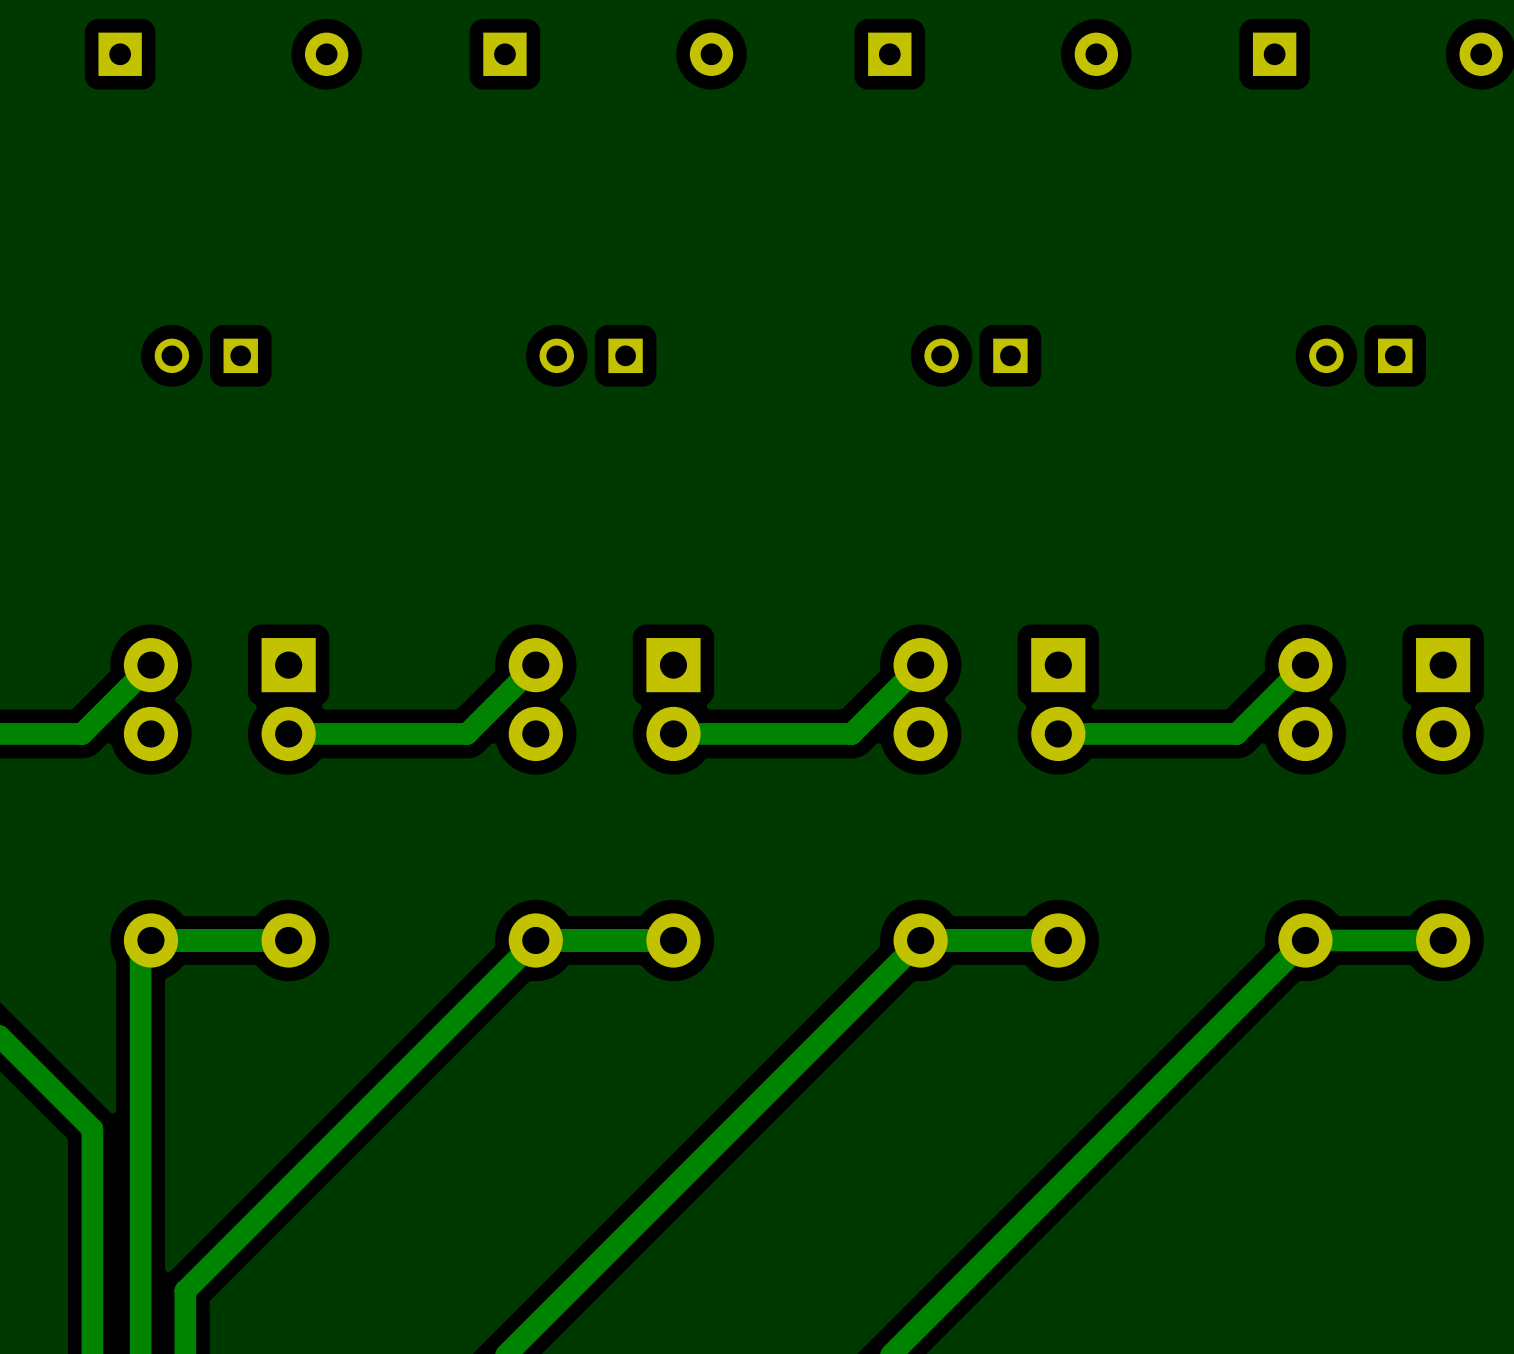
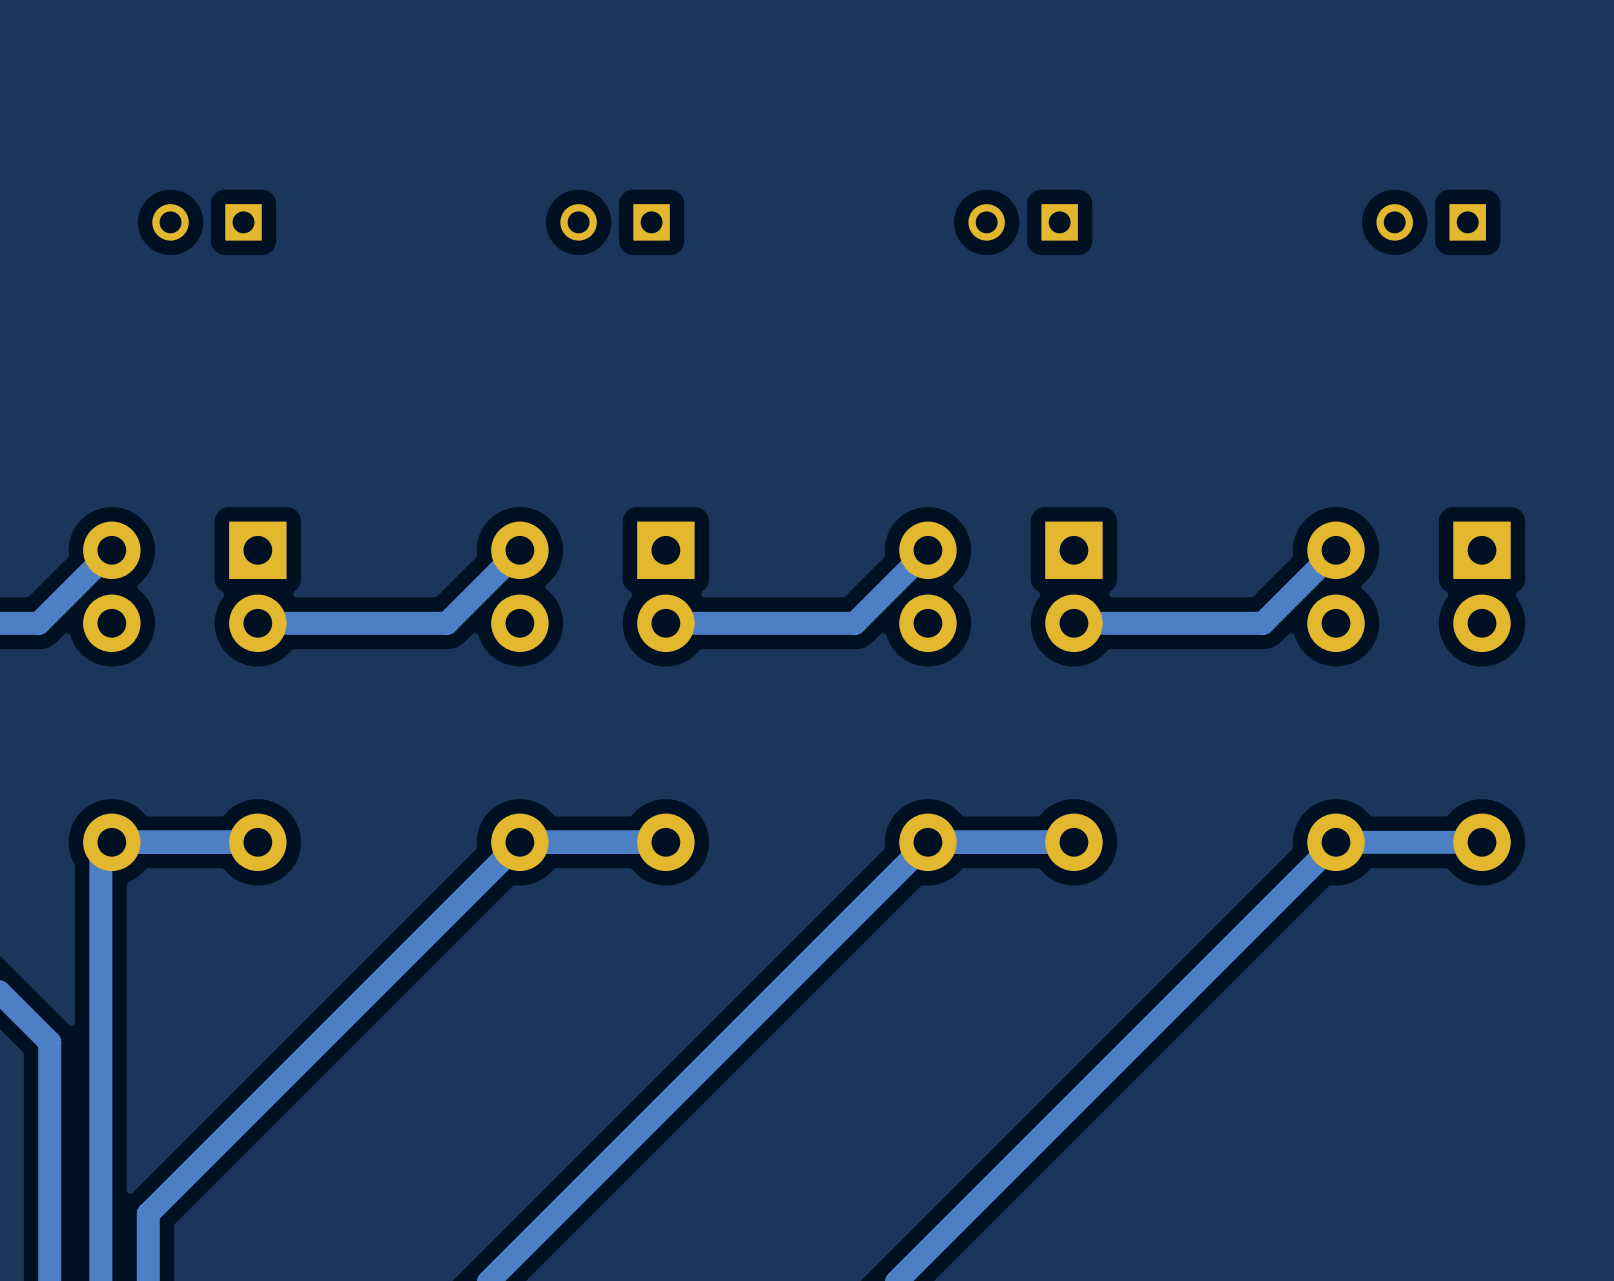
part position: (206, 355) -> (207, 222)
part position: (591, 355) -> (615, 222)
part position: (975, 355) -> (1023, 222)
part position: (1360, 355) -> (1431, 222)

